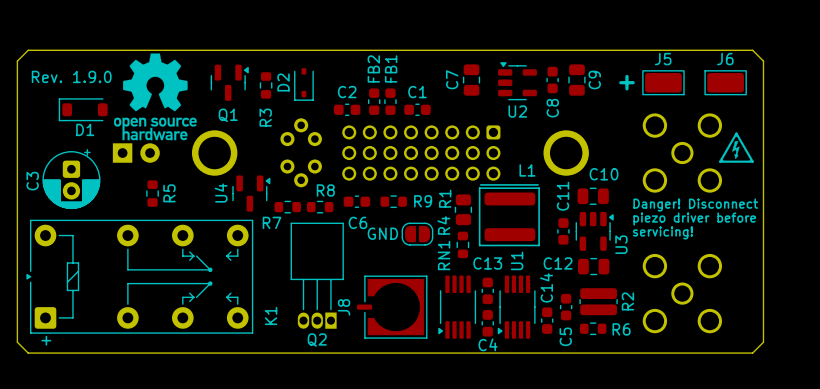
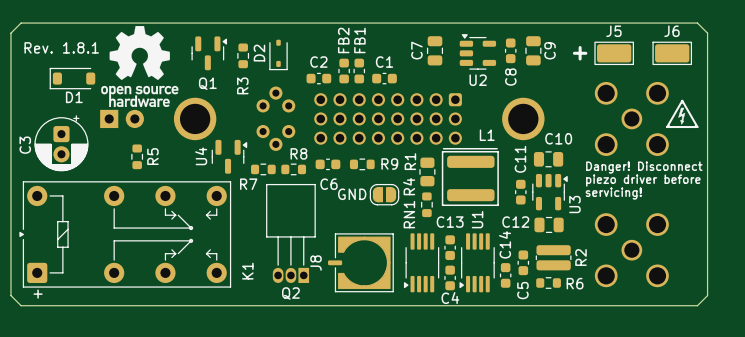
text: Rev. 1.9.0 (71, 76) -> Rev. 1.8.1 (61, 47)

